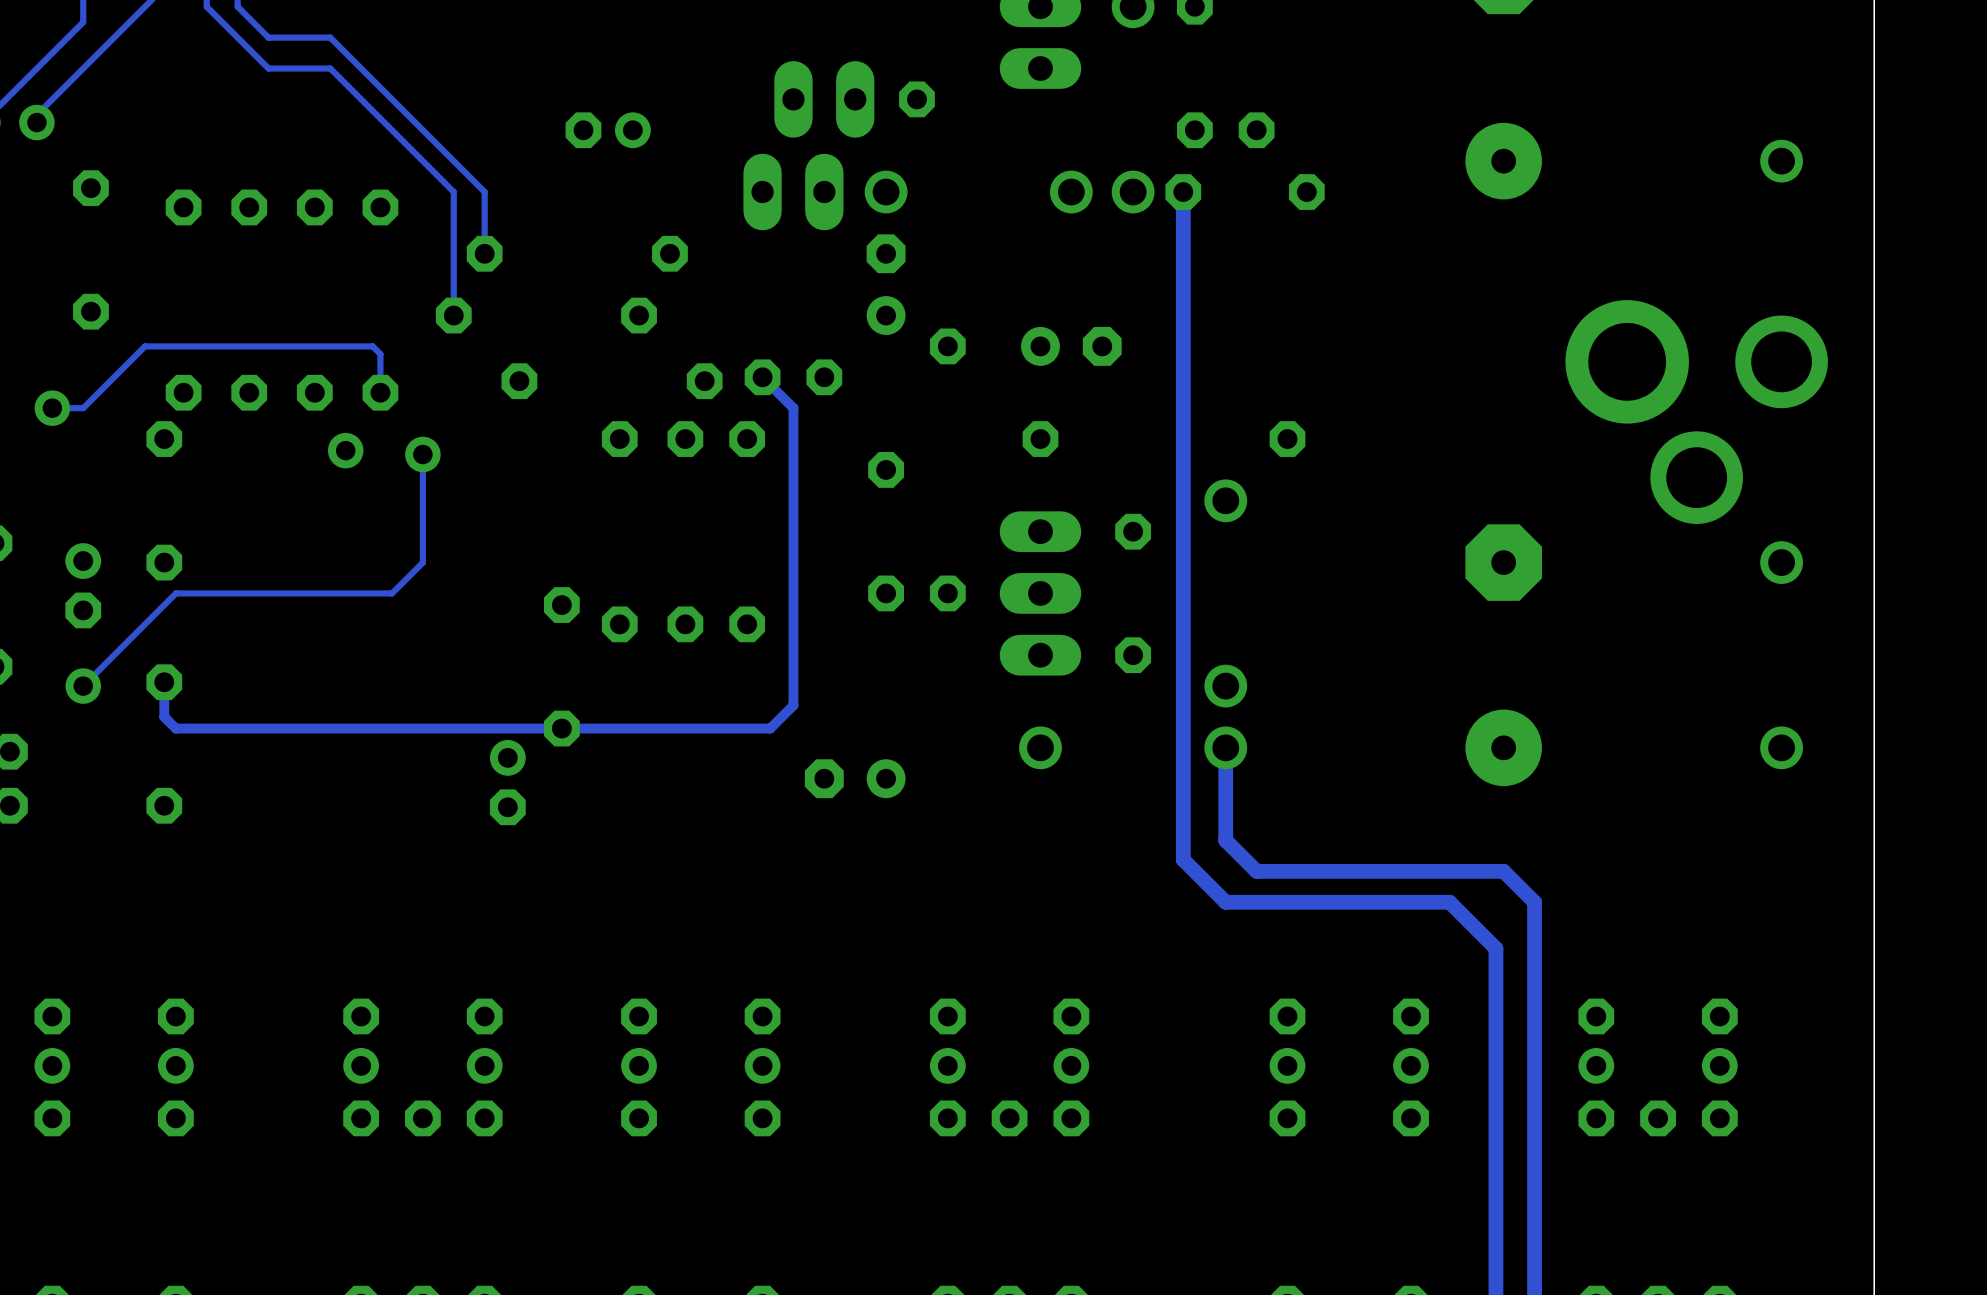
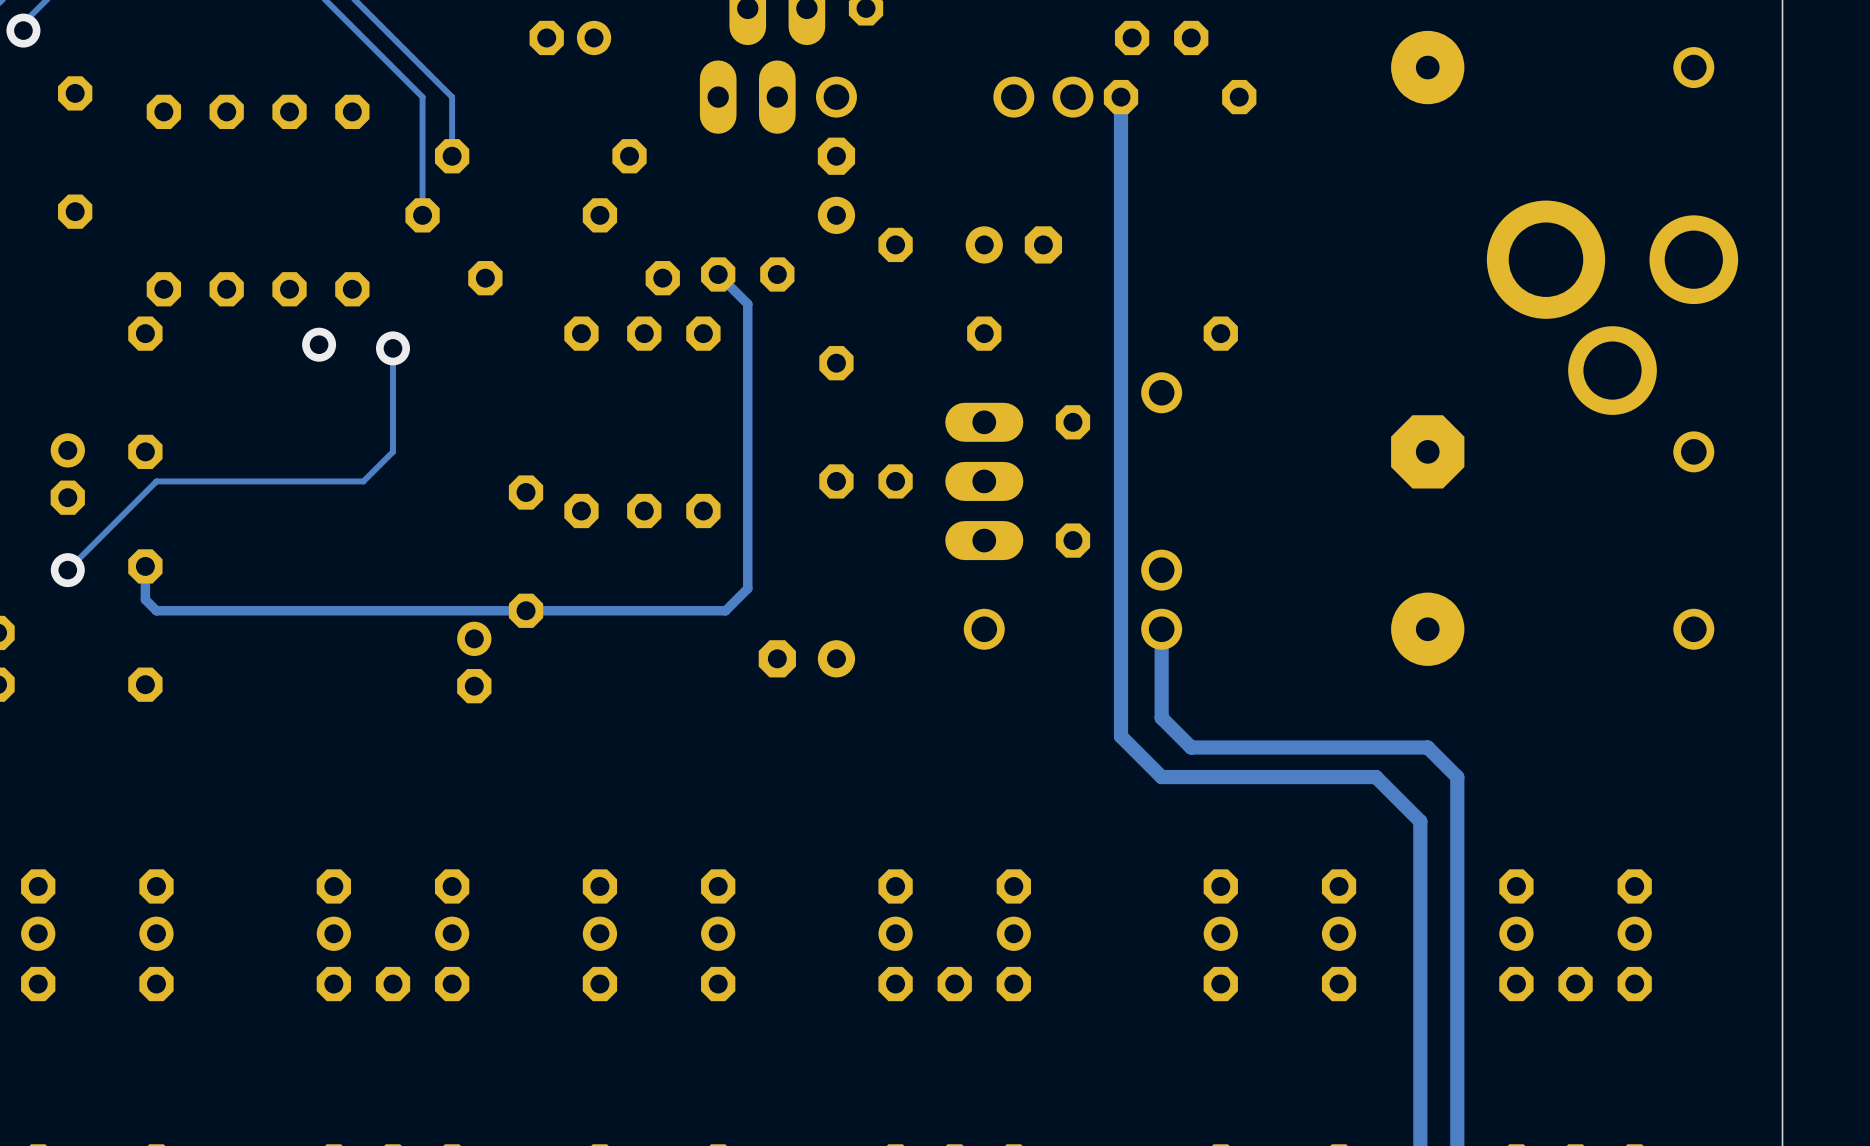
track: (380, 392) (380, 354) (372, 346) (145, 346) (83, 408) (52, 408) -> none
via: (52, 408) -> none

